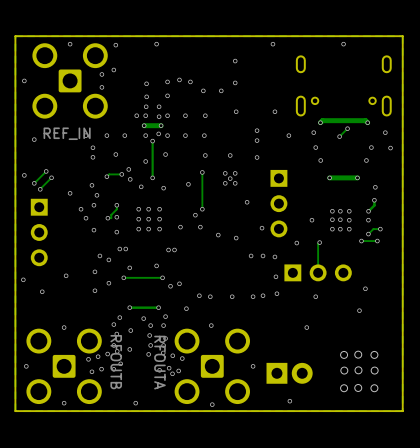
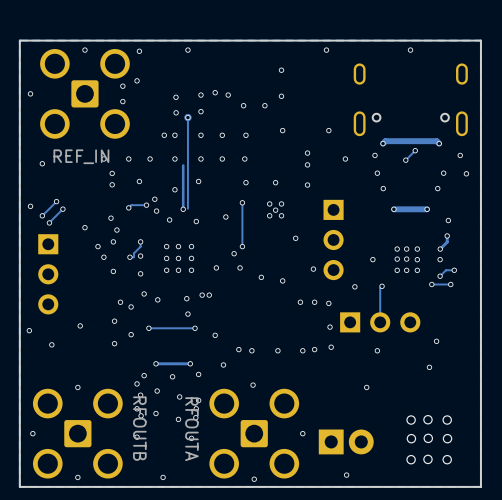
track: none -> (187, 117) (187, 208)
via: none -> (187, 117)
via: (146, 106) -> none
via: (159, 106) -> none
via: (159, 116) -> none
via: (144, 125) -> none
track: (161, 125) (144, 125) -> none
via: (161, 125) -> none
via: (158, 133) -> none
via: (152, 141) -> none
via: (125, 249) -> none
via: none -> (186, 298)
via: none -> (157, 299)
via: (129, 267) -> none
via: (170, 286) -> none
via: (150, 325) -> none
via: (163, 325) -> none
via: (150, 345) -> none
via: (107, 354) -> none
via: (172, 355) -> none
via: (98, 356) -> none
via: (182, 358) -> none
via: (88, 359) -> none
via: (120, 363) -> none
via: (169, 368) -> none
via: (101, 369) -> none
via: (178, 370) -> none
via: (91, 371) -> none
via: (172, 373) -> none

